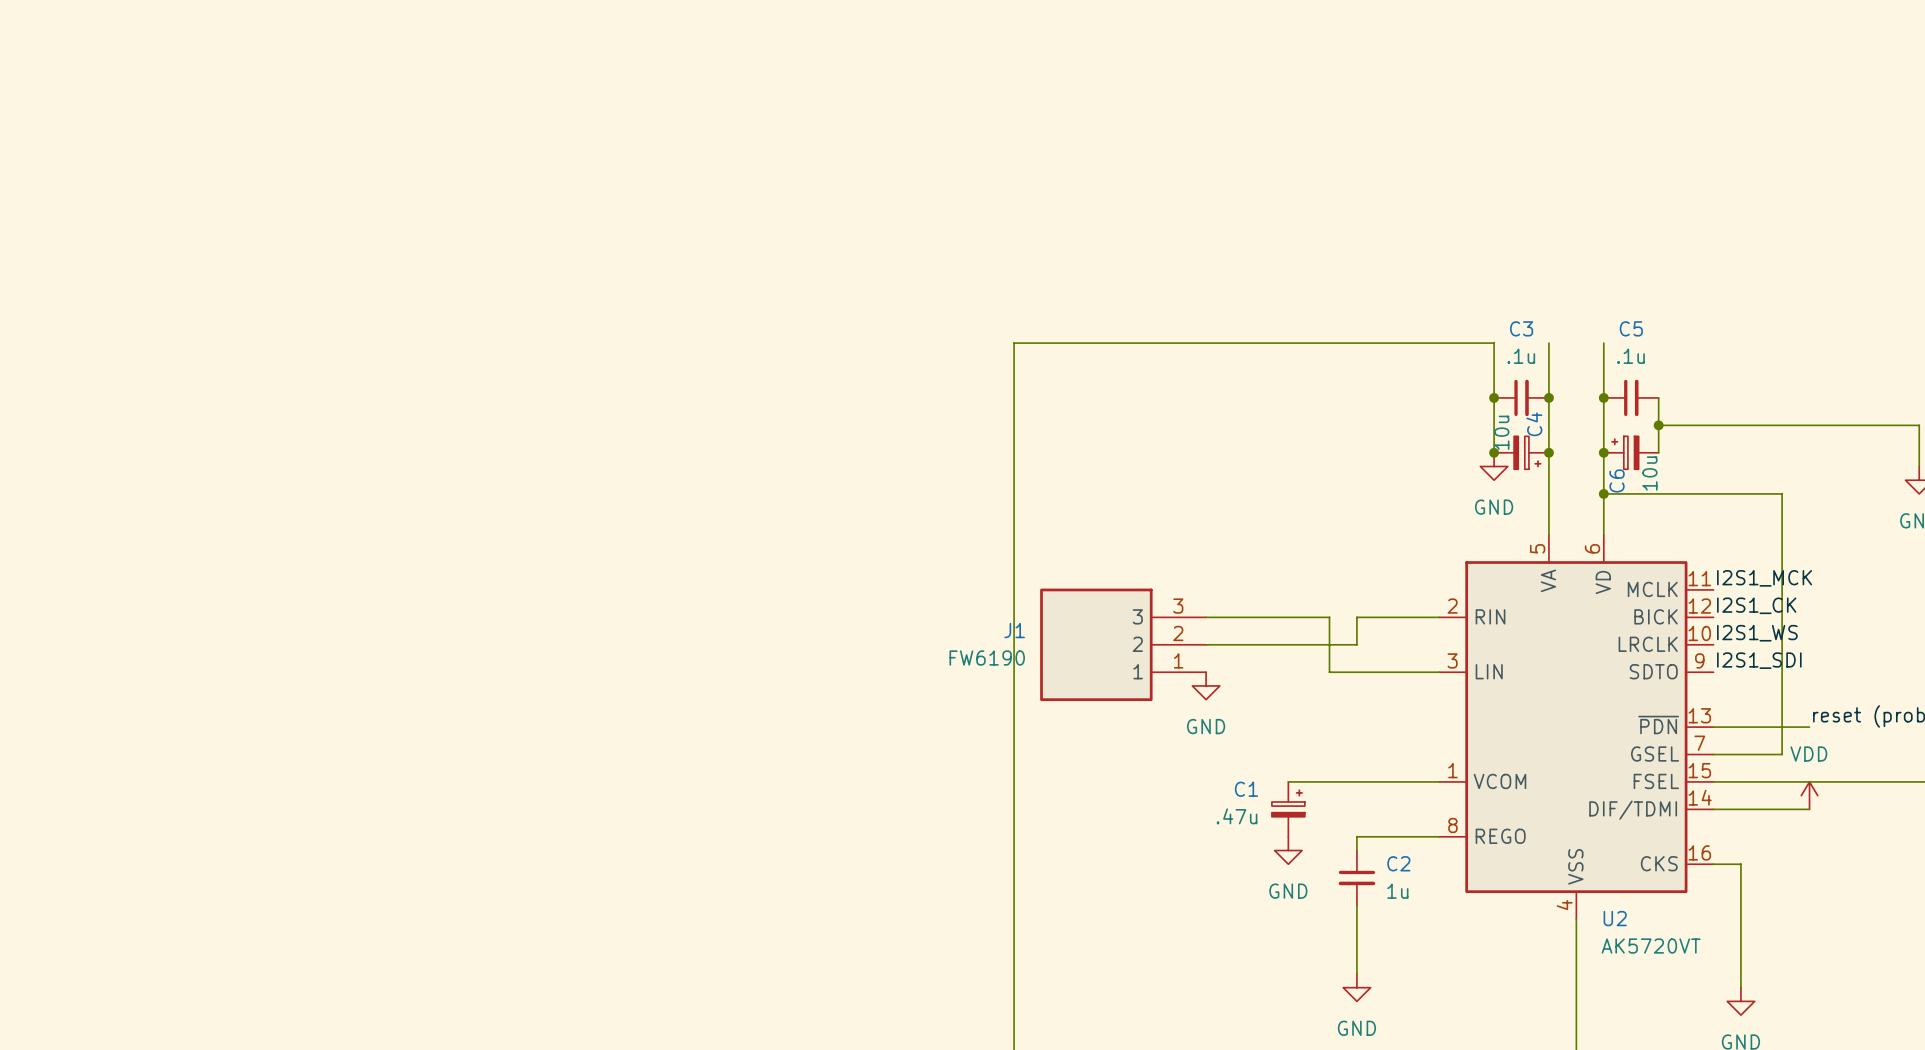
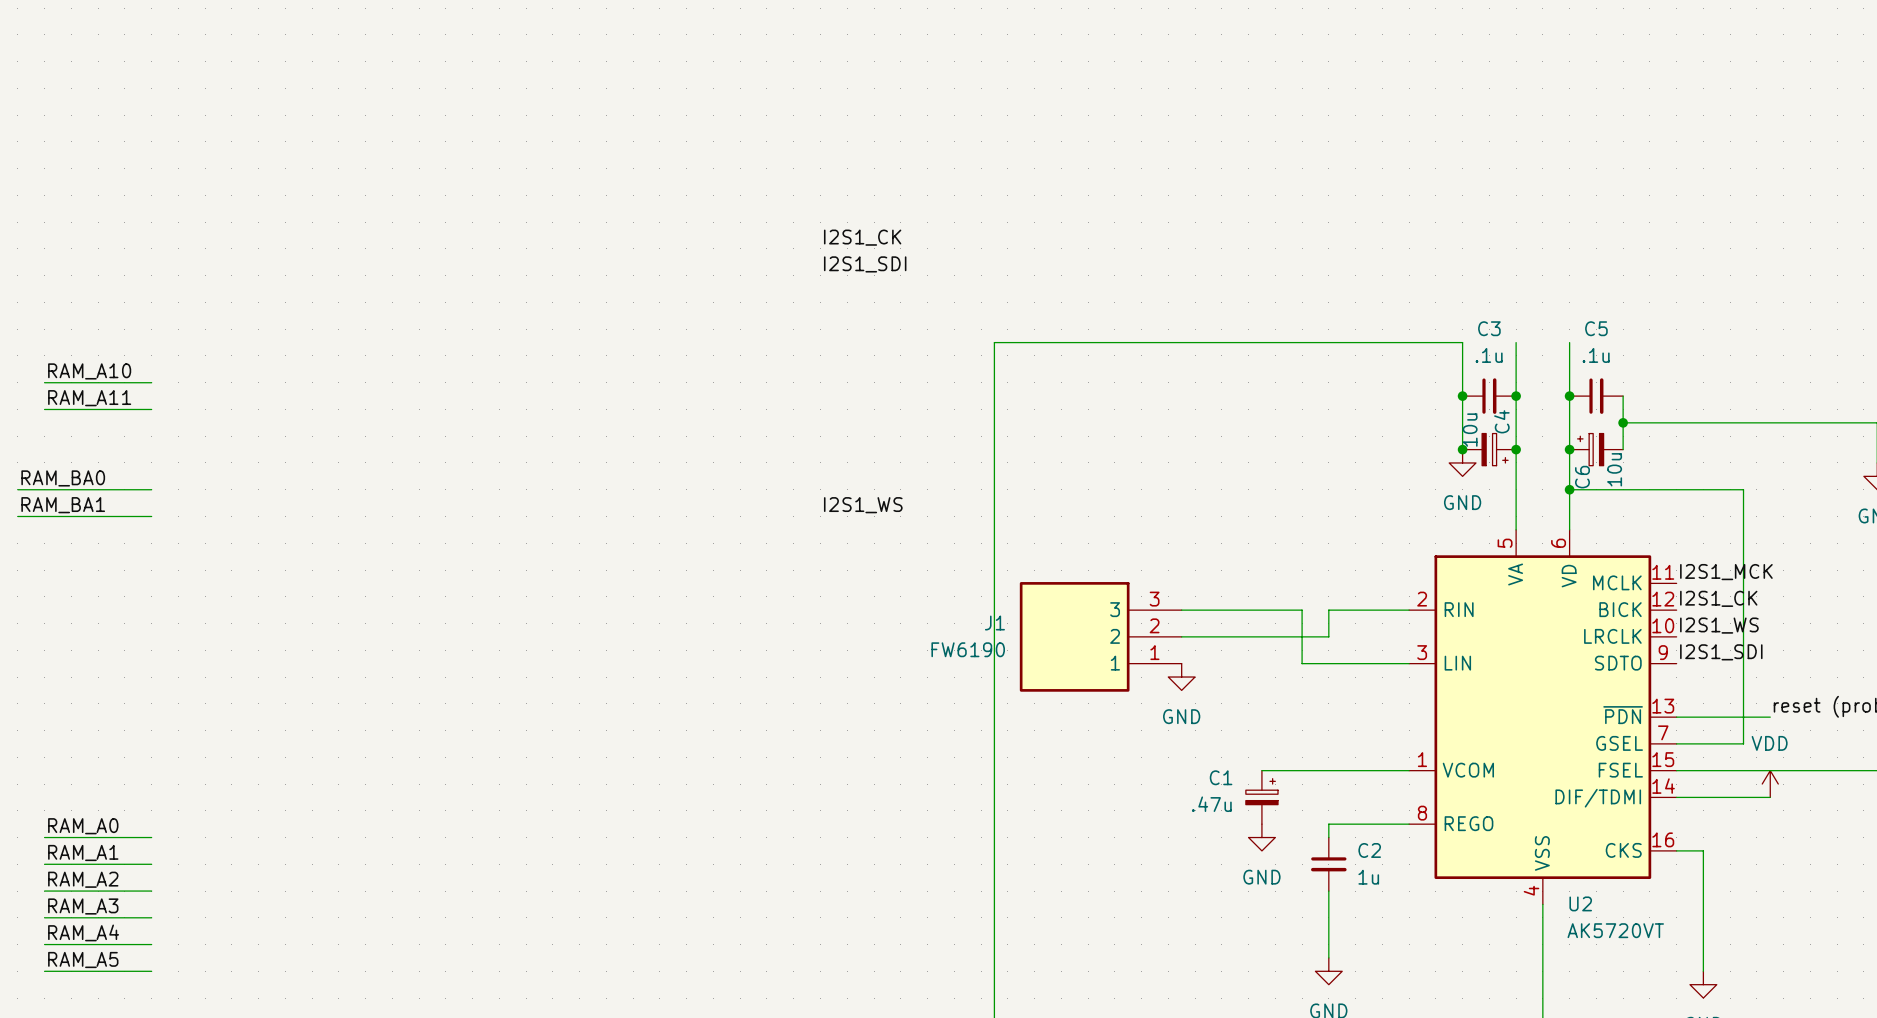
label: none -> I2S1_CK (862, 237)
label: none -> I2S1_SDI (865, 264)
label: none -> RAM_A10 (89, 371)
wire: none -> (44, 382) (151, 382)
label: none -> RAM_A11 (89, 398)
wire: none -> (44, 409) (151, 409)
label: none -> RAM_BA0 (63, 478)
wire: none -> (17, 489) (151, 489)
label: none -> RAM_BA1 (63, 505)
label: none -> I2S1_WS (863, 505)
wire: none -> (17, 516) (151, 516)
label: none -> RAM_A0 (83, 826)
wire: none -> (44, 837) (151, 837)
label: none -> RAM_A1 (83, 852)
wire: none -> (44, 864) (151, 864)
label: none -> RAM_A2 (83, 879)
wire: none -> (44, 891) (151, 891)
label: none -> RAM_A3 (83, 906)
wire: none -> (44, 917) (151, 917)
label: none -> RAM_A4 (83, 932)
wire: none -> (44, 944) (151, 944)
label: none -> RAM_A5 (83, 960)
wire: none -> (44, 971) (151, 971)

